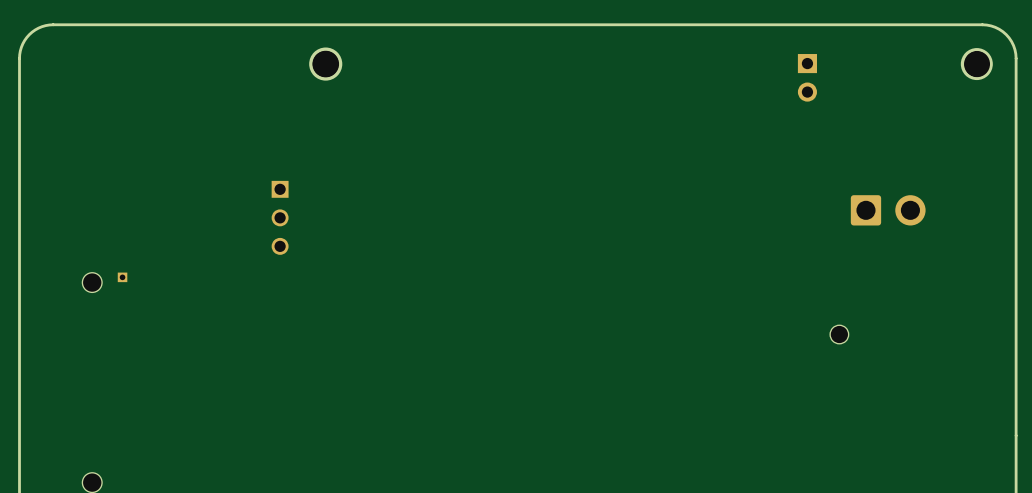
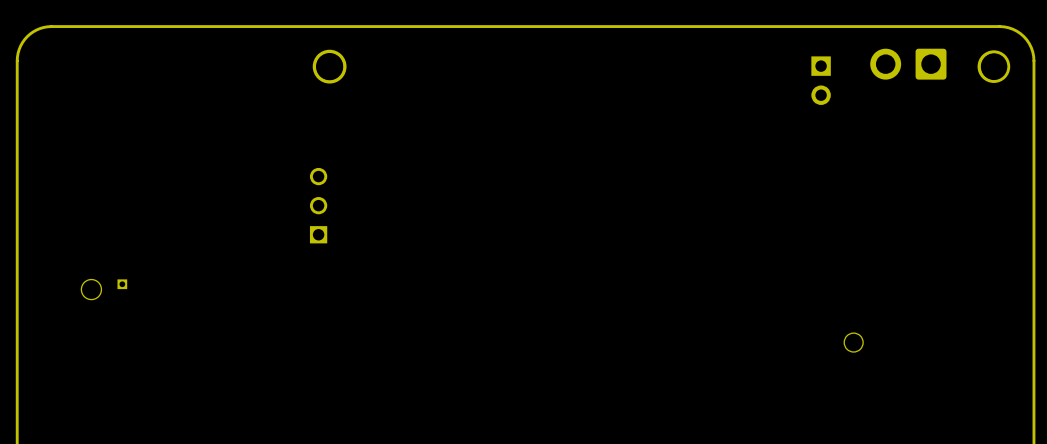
part rotation: 0° (888, 210) -> 180° (908, 64)
part position: (888, 210) -> (908, 64)
part rotation: 0° (280, 217) -> 180° (318, 205)

